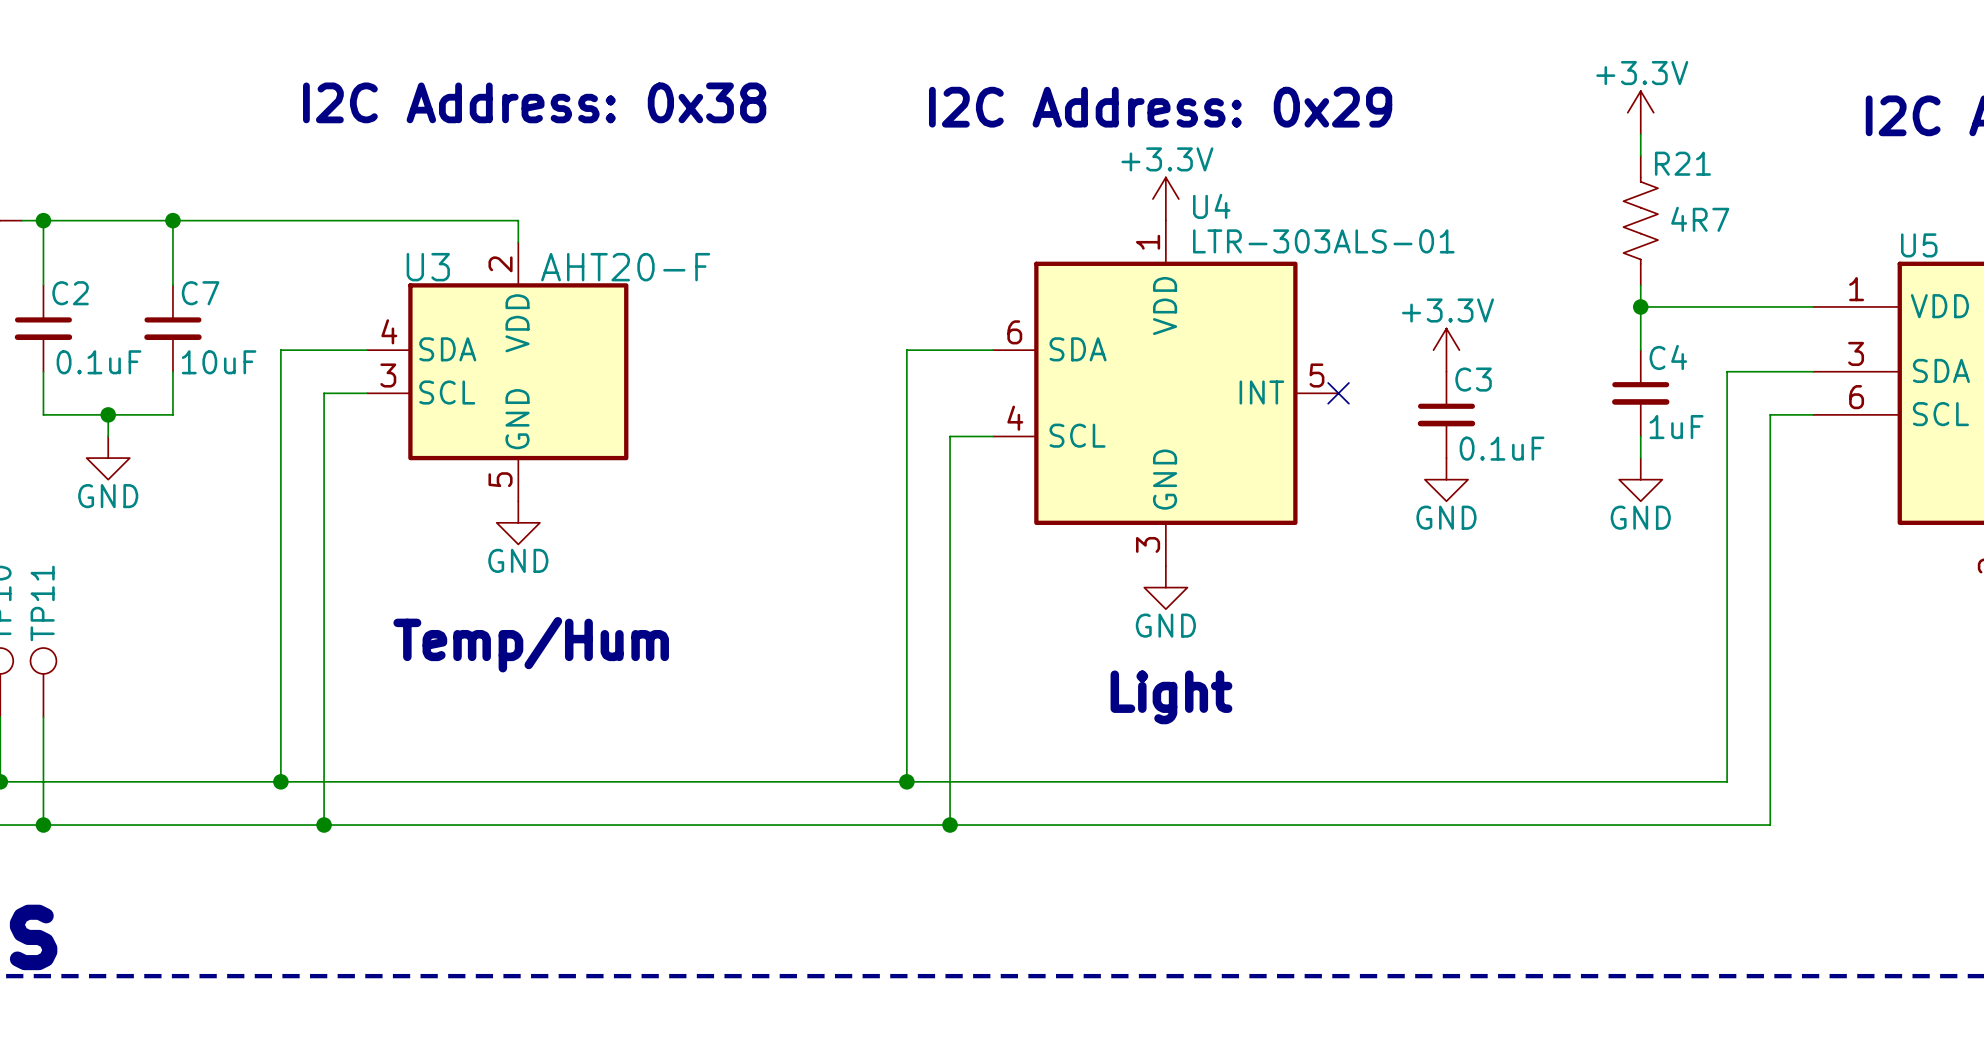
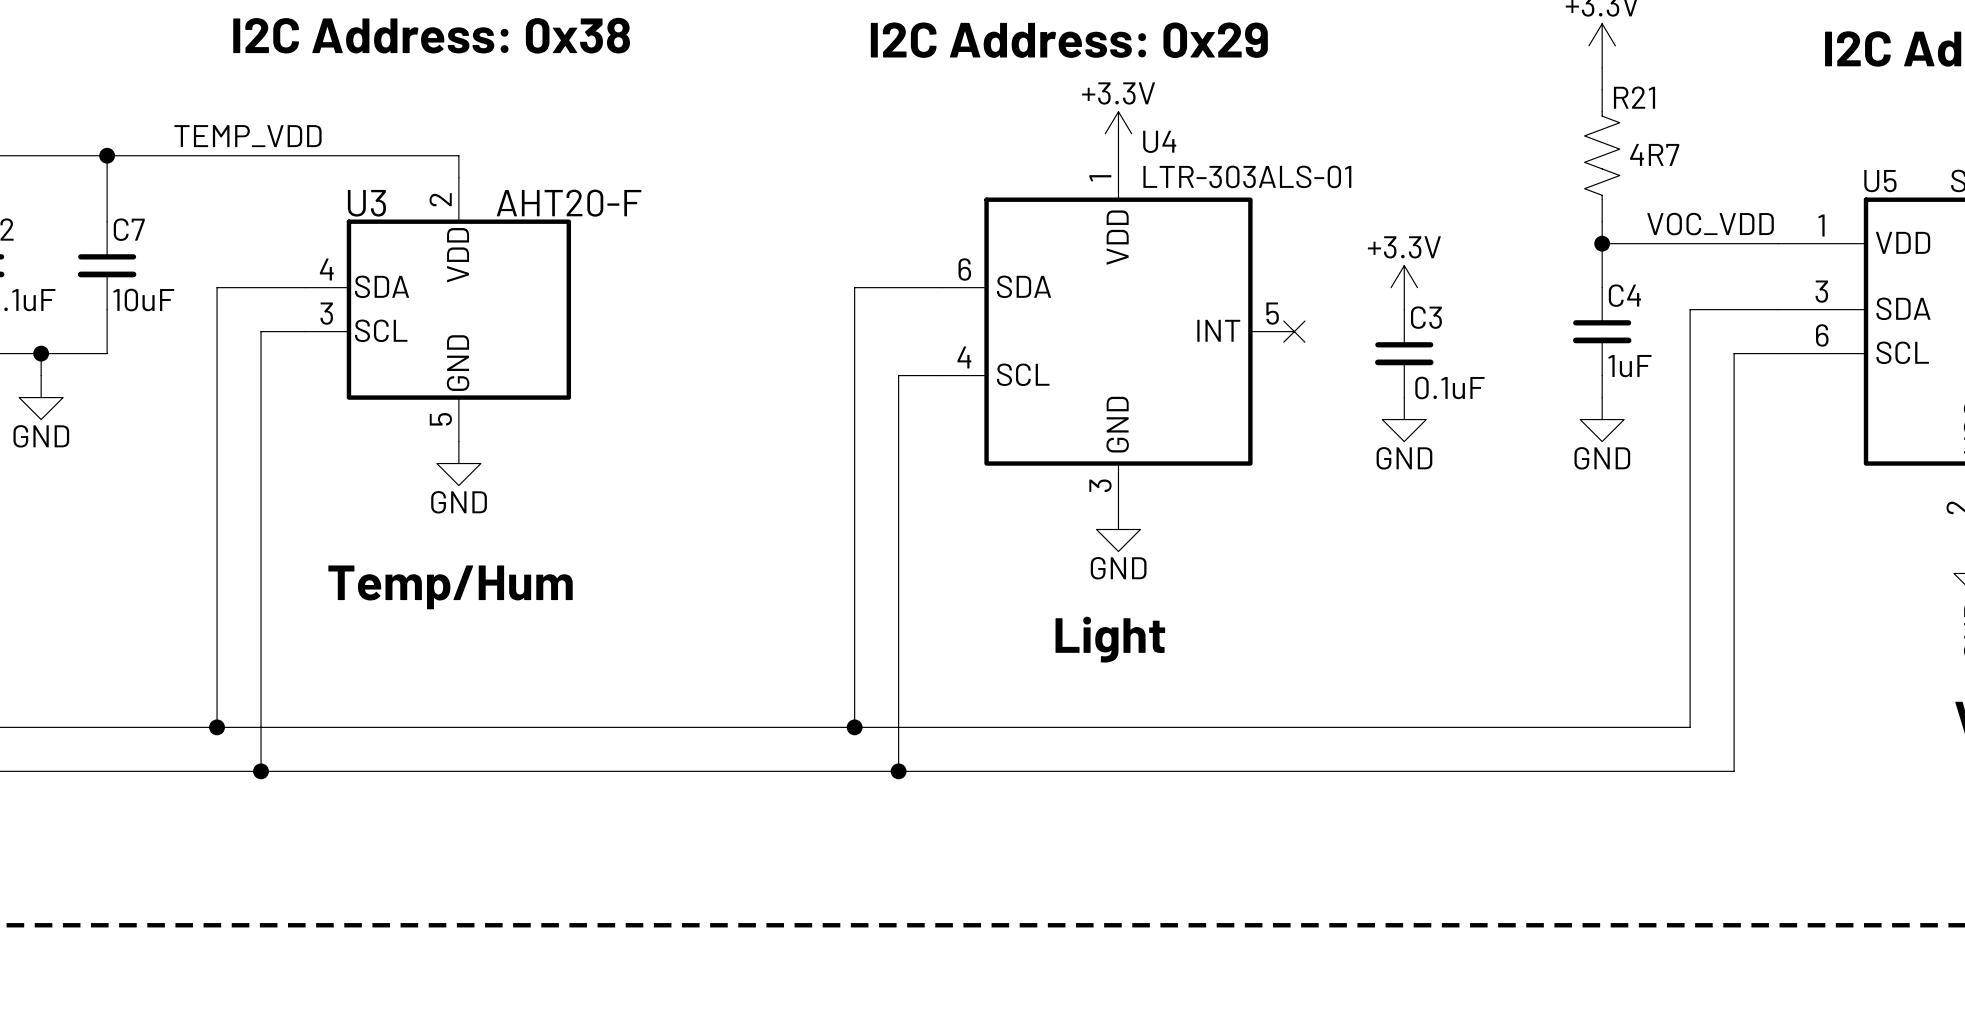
label: none -> TEMP_VDD (247, 136)
label: none -> VOC_VDD (1710, 224)

